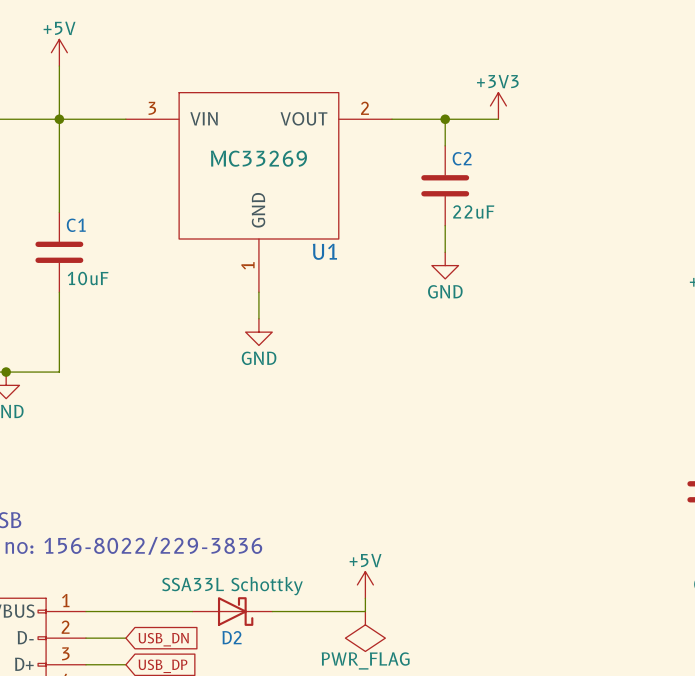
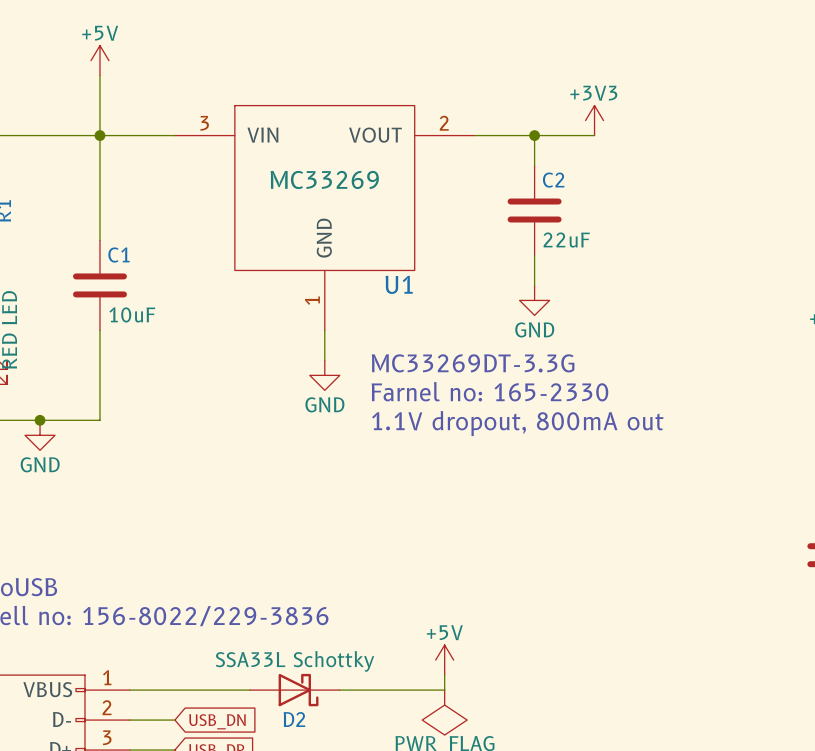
text: none -> MC33269DT-3.3G (473, 363)
text: none -> Farnel no: 165-2330 (489, 391)
text: none -> 1.1V dropout, 800mA out (517, 423)

